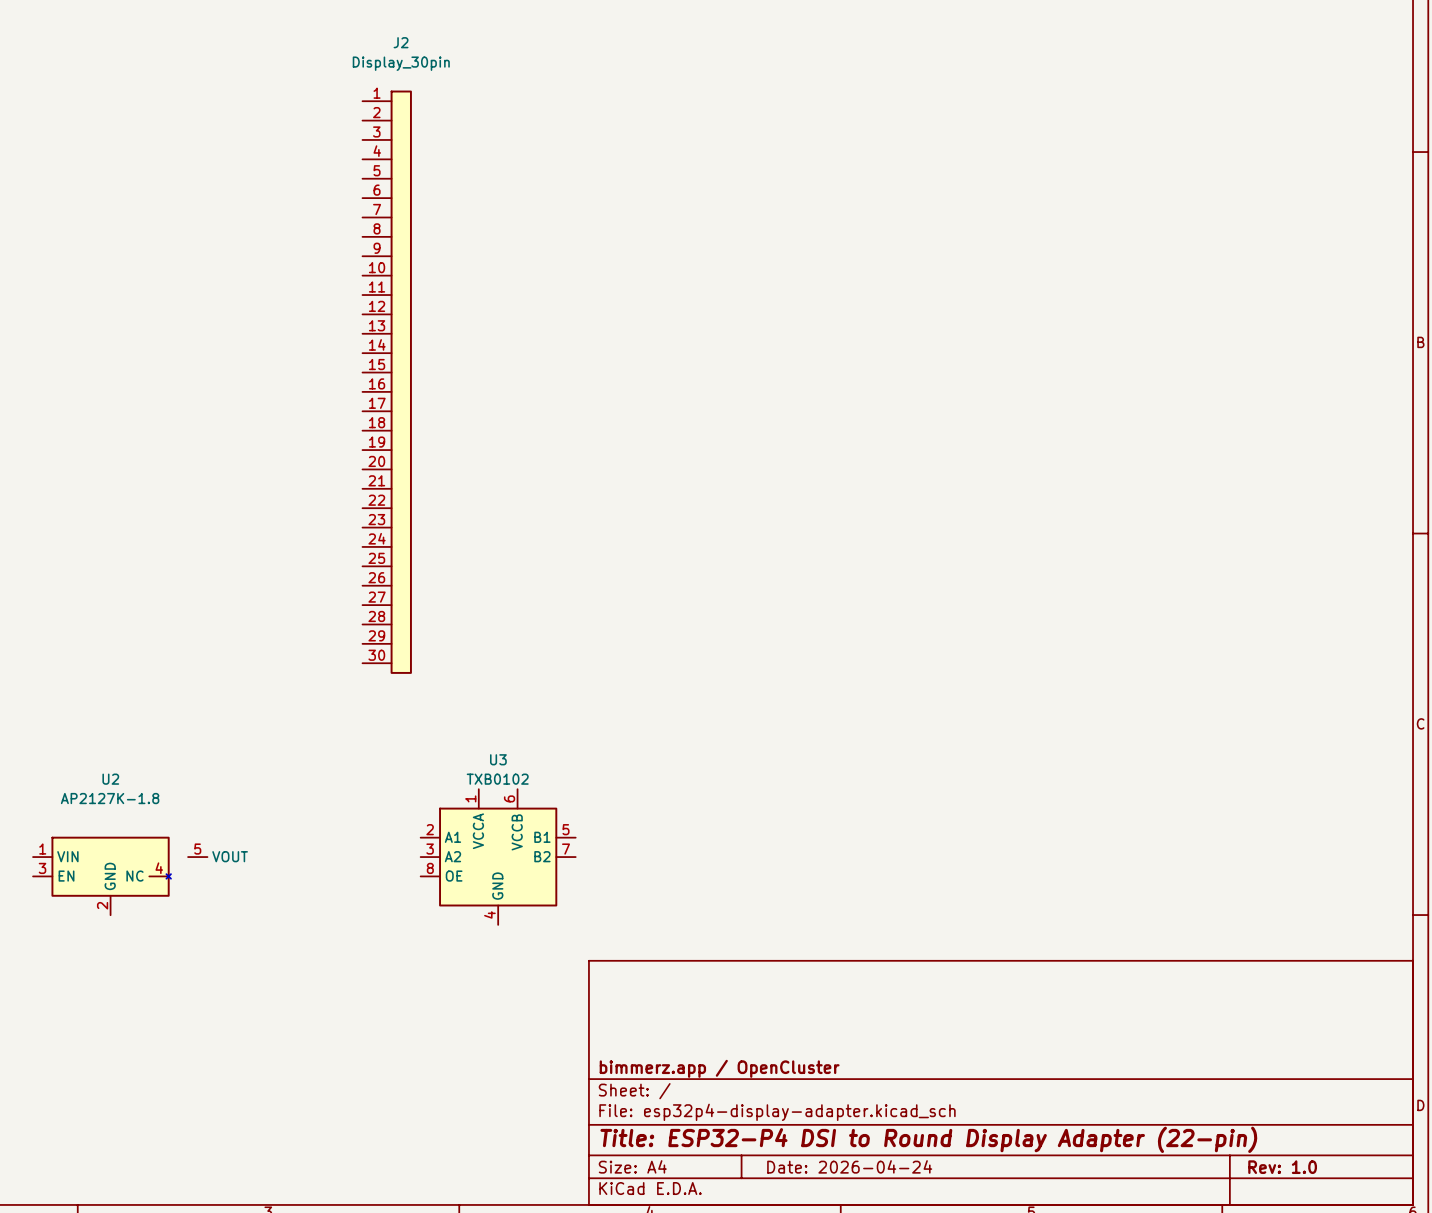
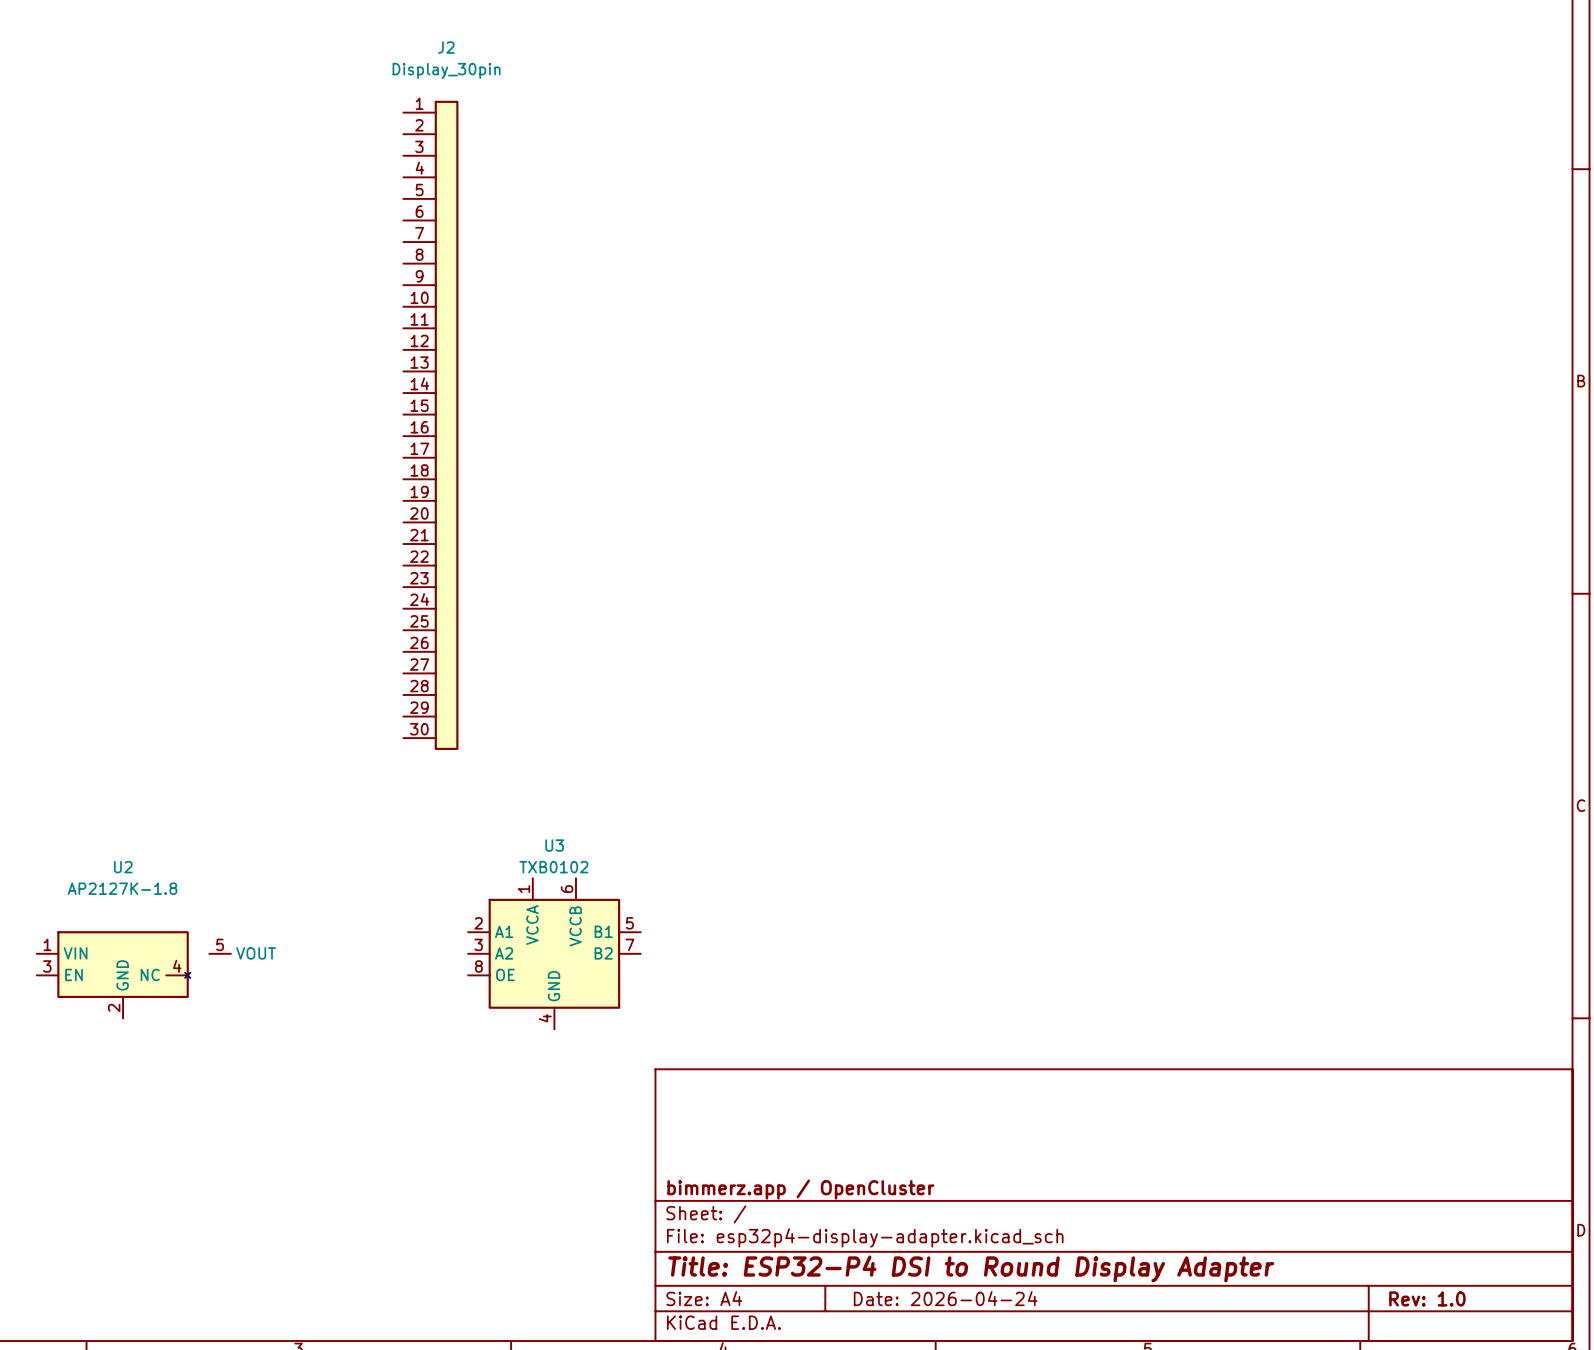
title block: Title: ESP32-P4 DSI to Round Display Adapter (22-pin) (928, 1139) -> Title: ESP32-P4 DSI to Round Display Adapter (971, 1268)

